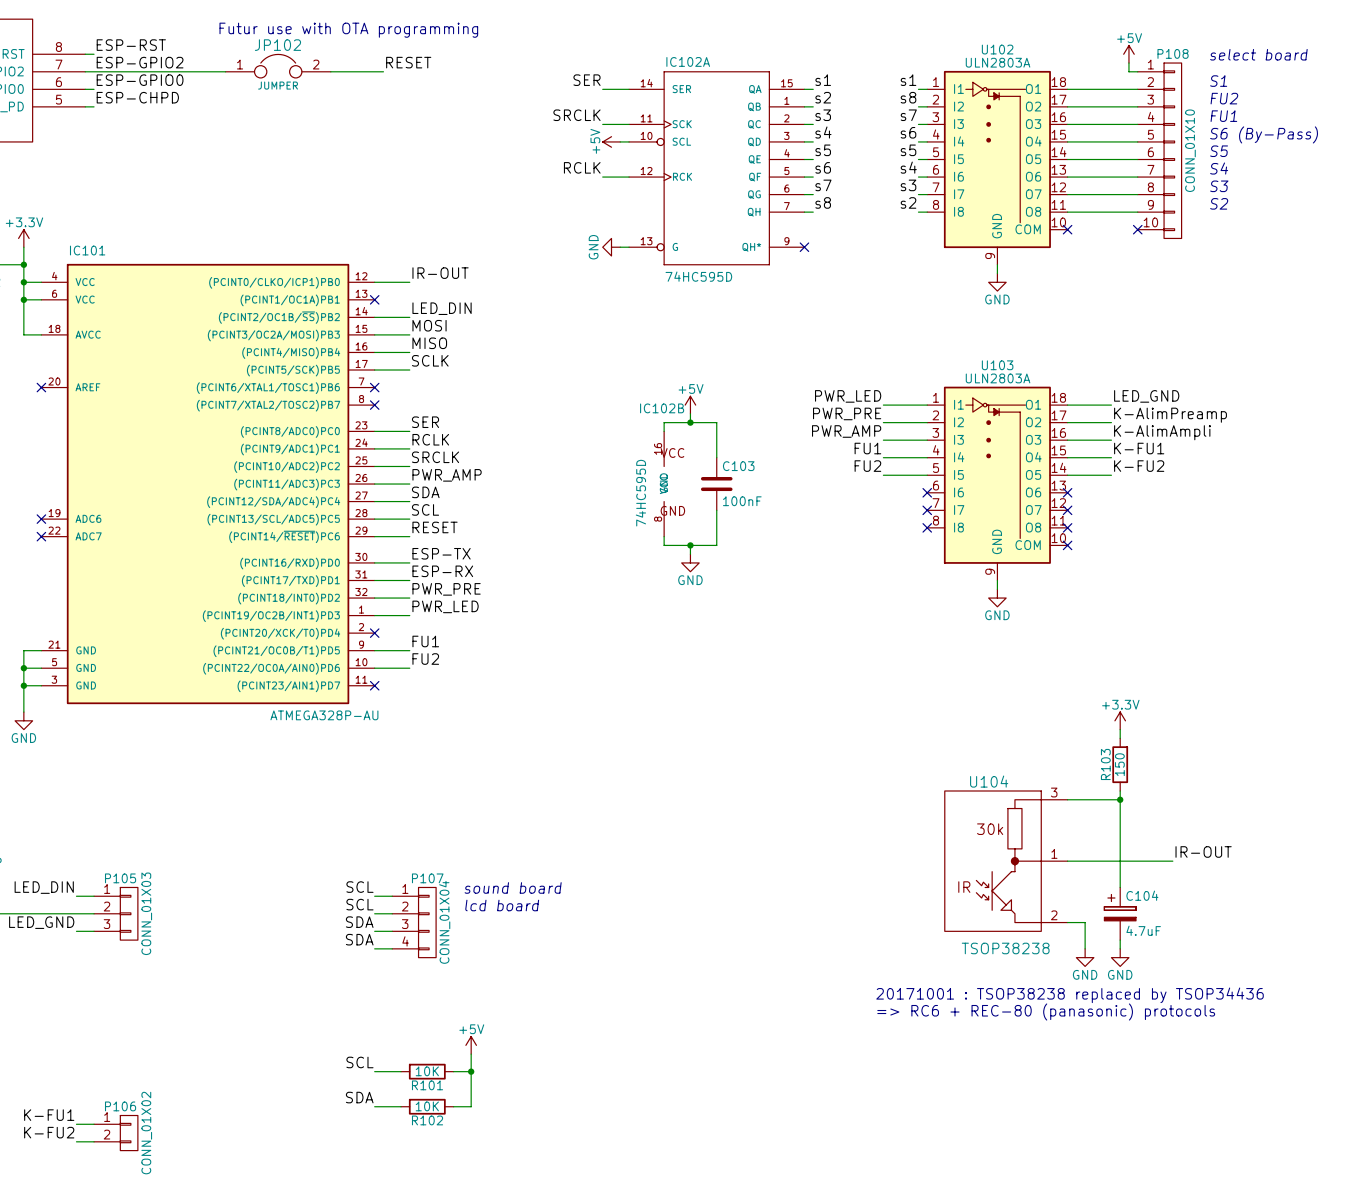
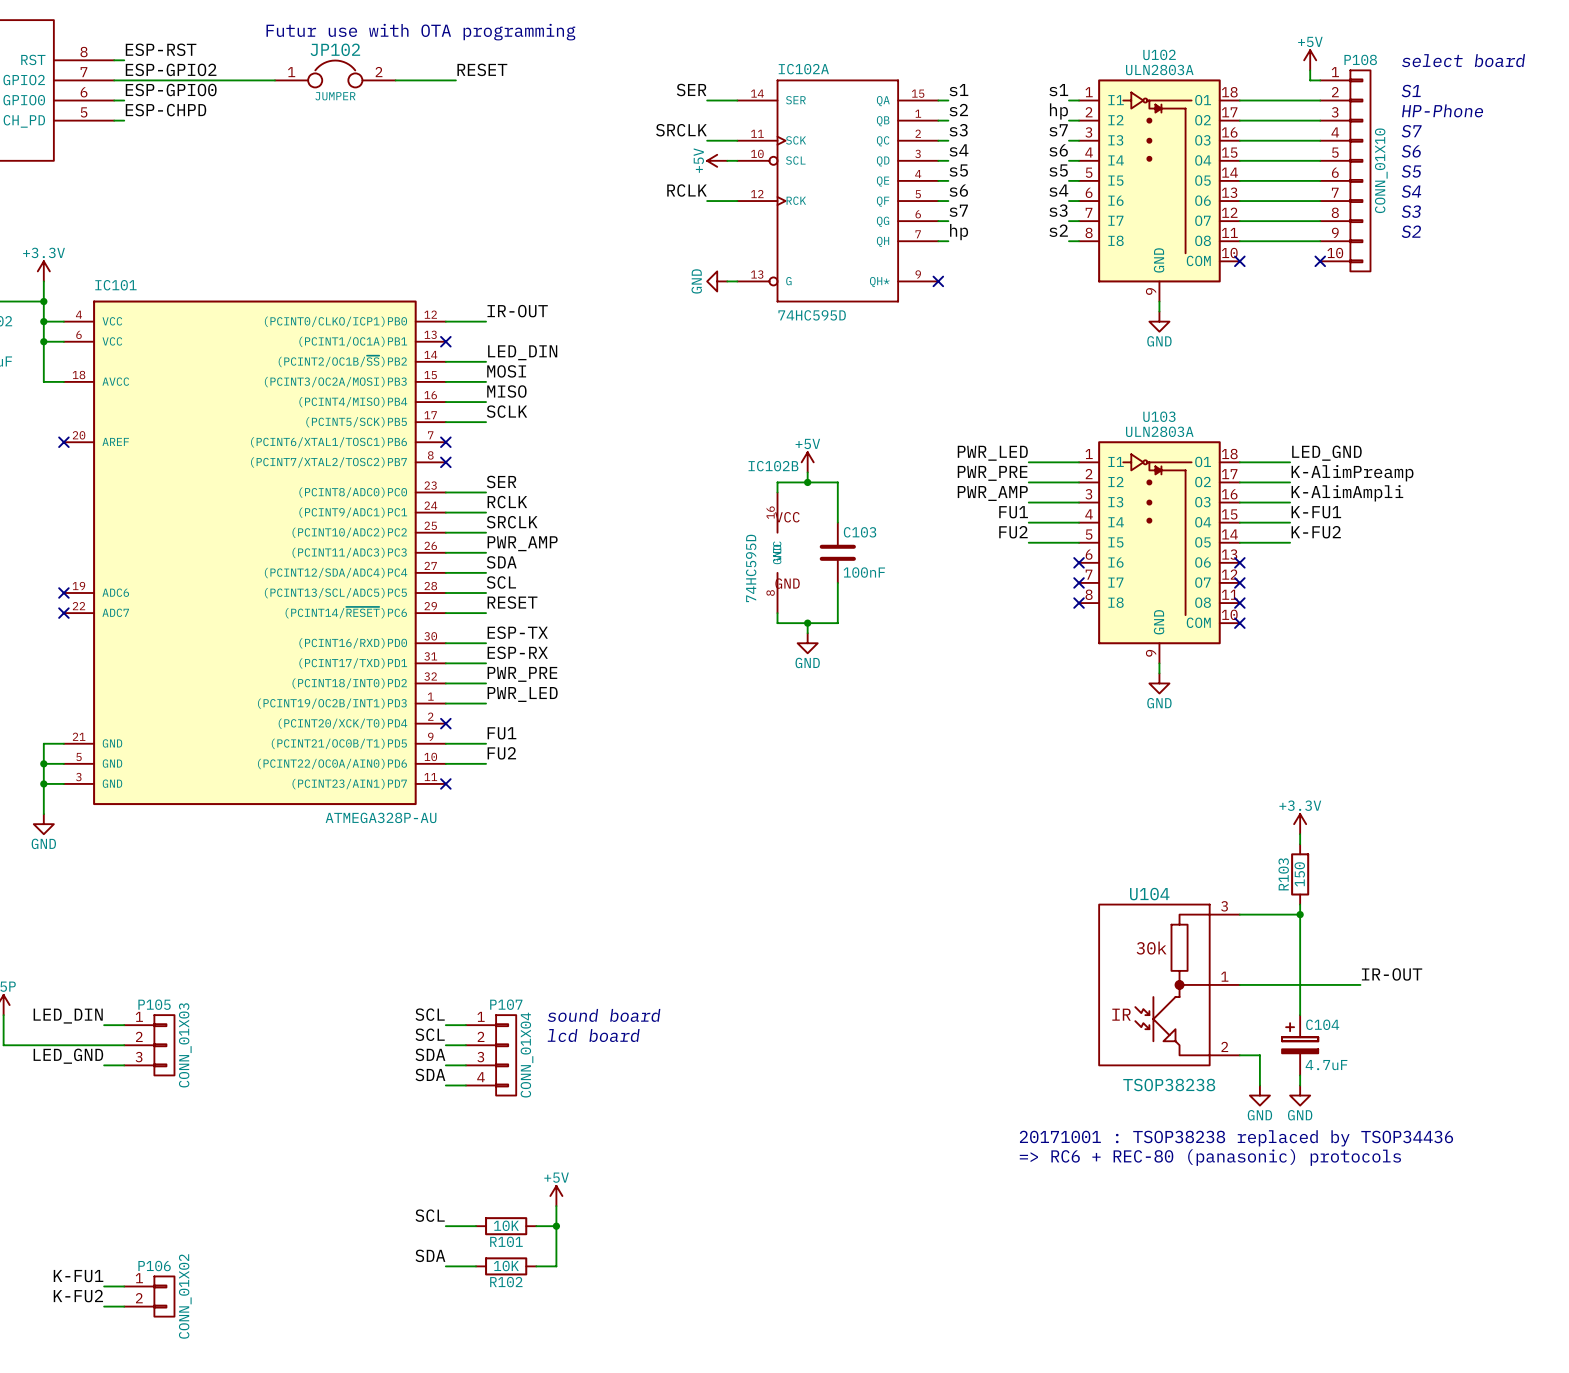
label: s8 (908, 97) -> hp (1058, 111)
text: FU2 (1224, 98) -> HP-Phone (1442, 110)
text: FU1 (1223, 116) -> S7 (1411, 131)
text: S6 (By-Pass) (1264, 134) -> S6 (1411, 151)
label: s8 (823, 202) -> hp (959, 232)

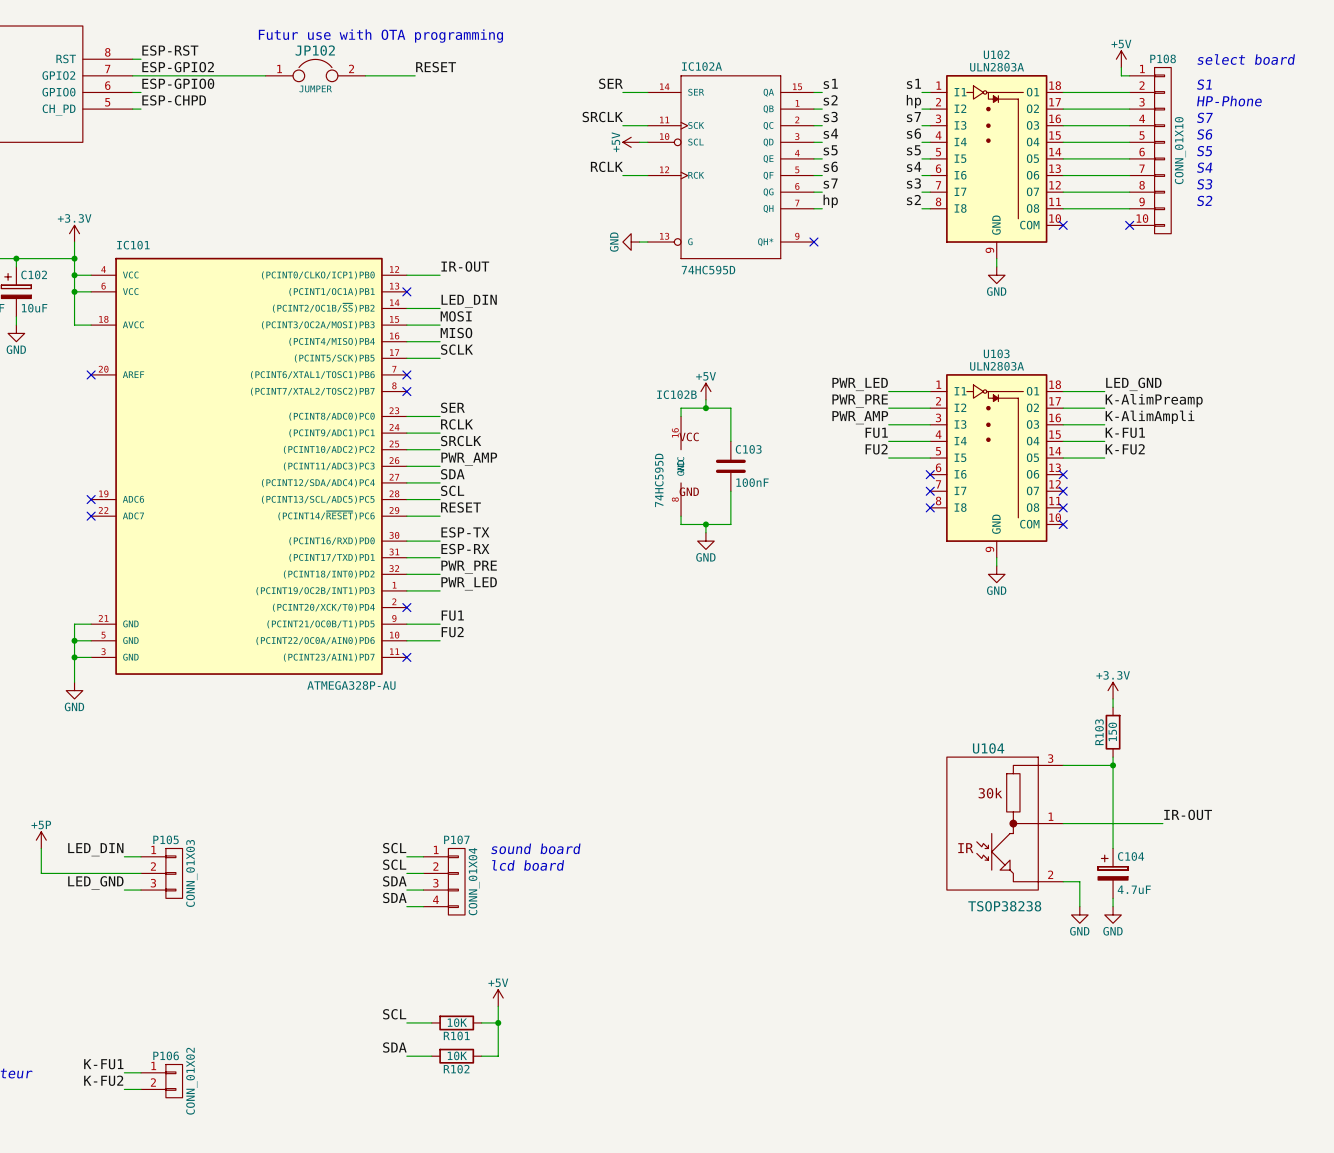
text: 20171001 : TSOP38238 replaced by TSOP34436 (1236, 1138) -> none
text: => RC6 + REC-80 (panasonic) protocols (1210, 1157) -> none

